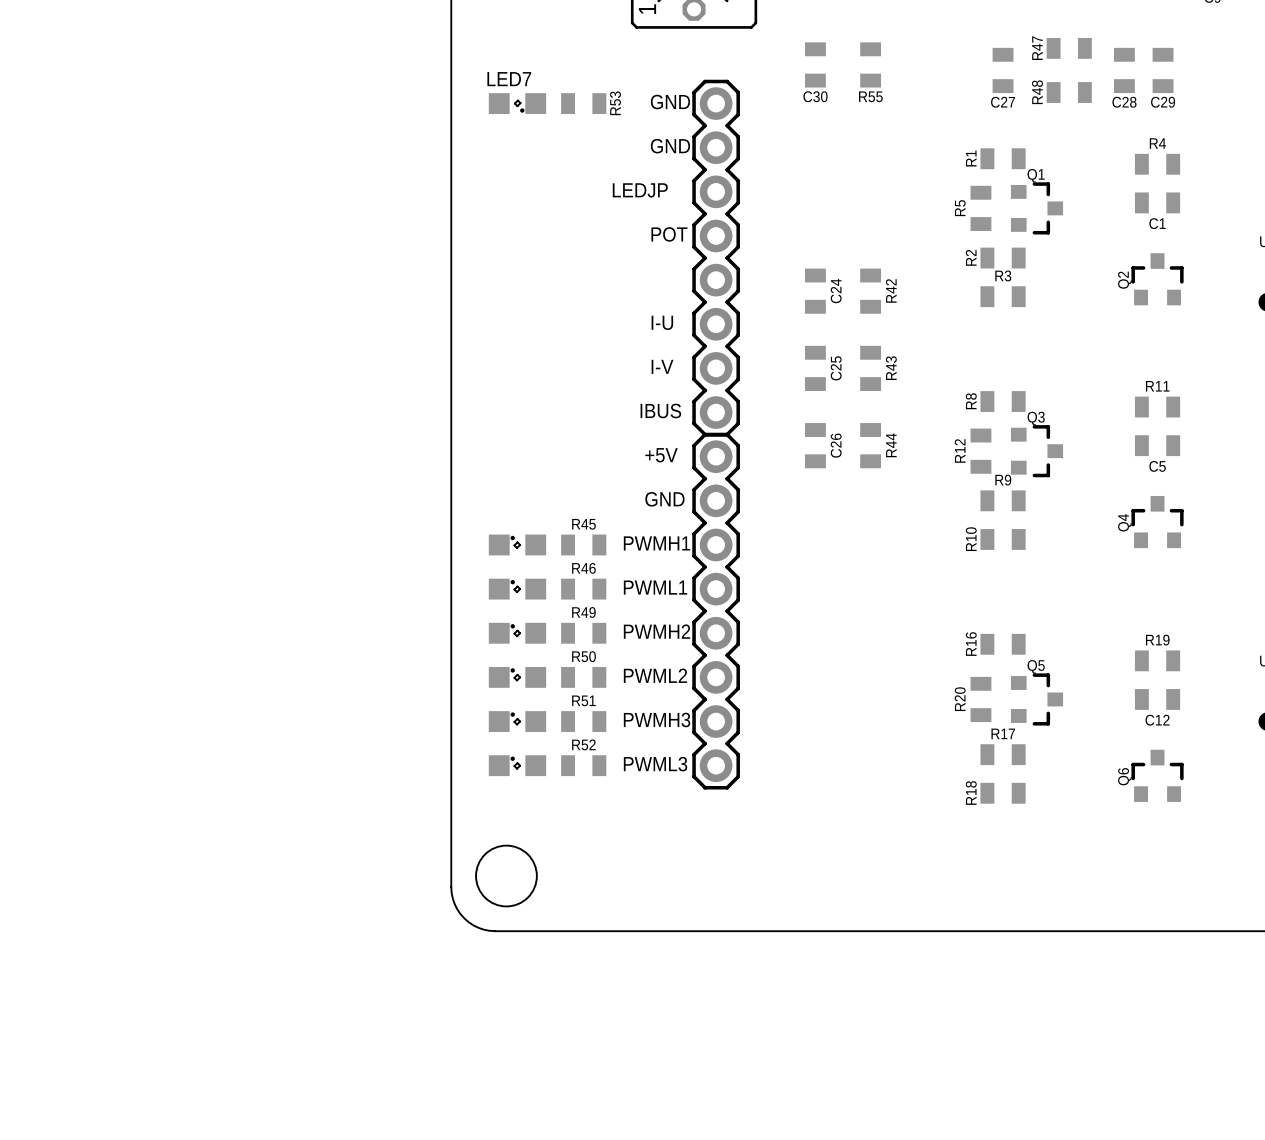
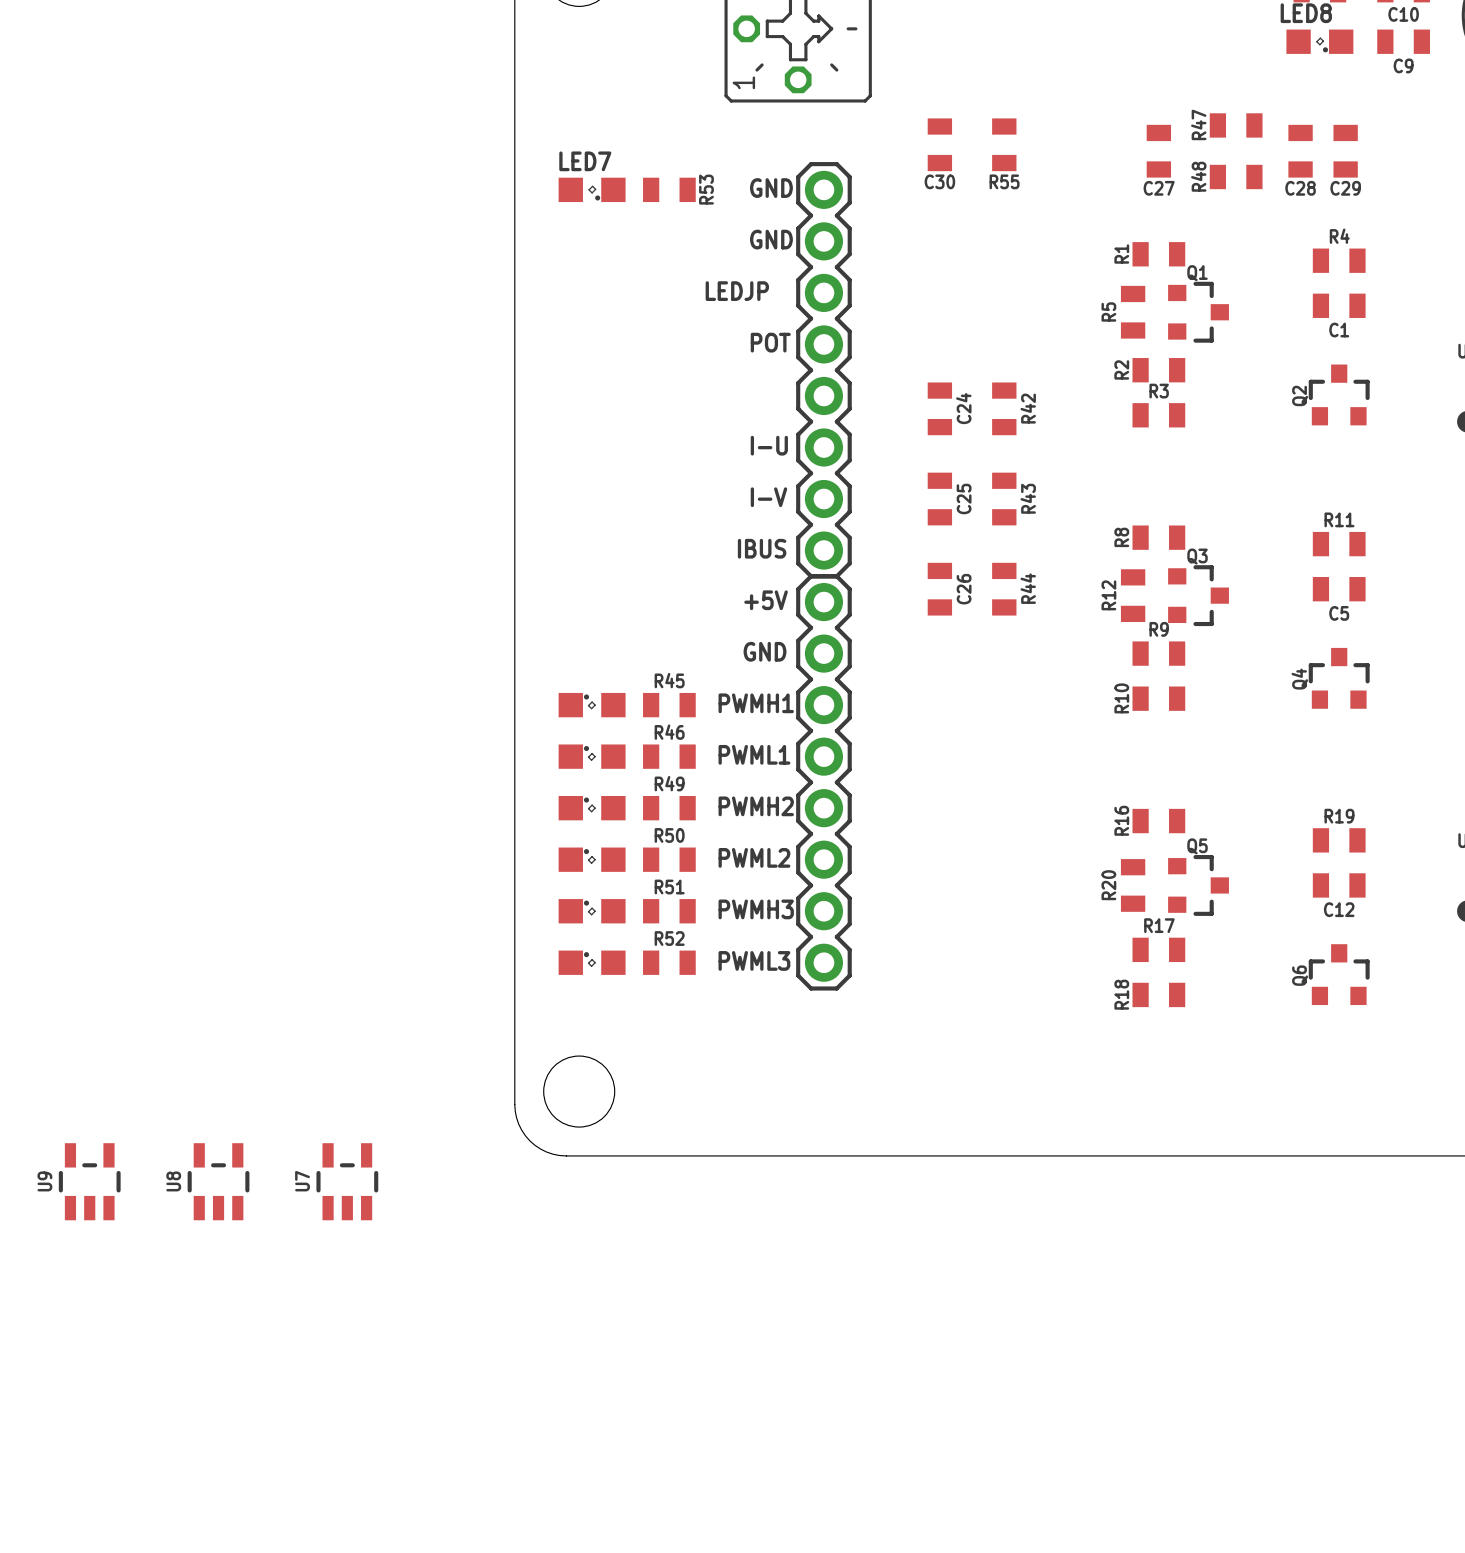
U9: none -> (89, 1181)
U8: none -> (218, 1181)
U7: none -> (347, 1181)

